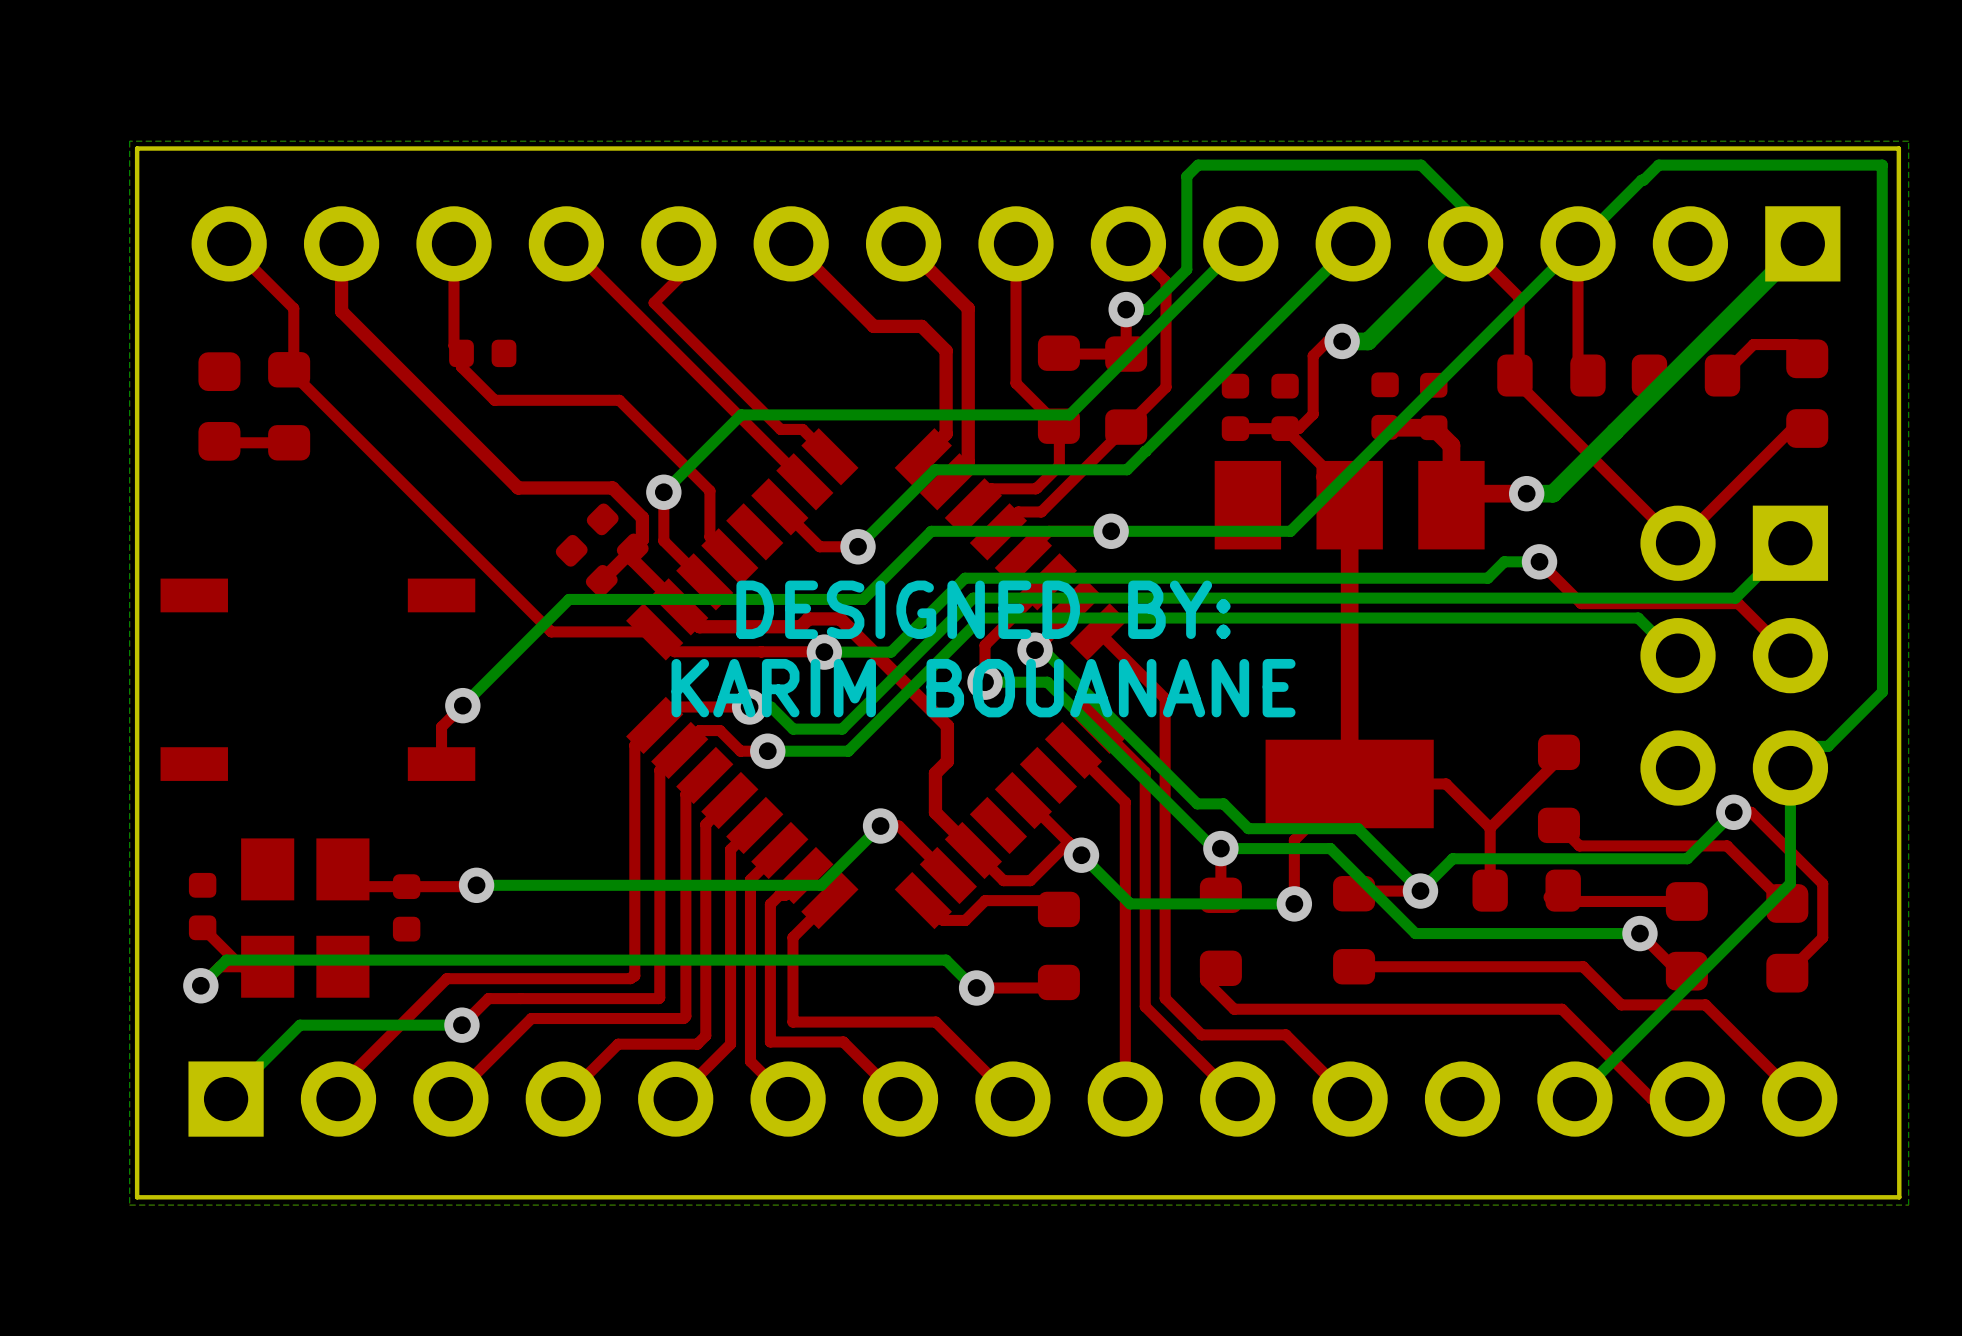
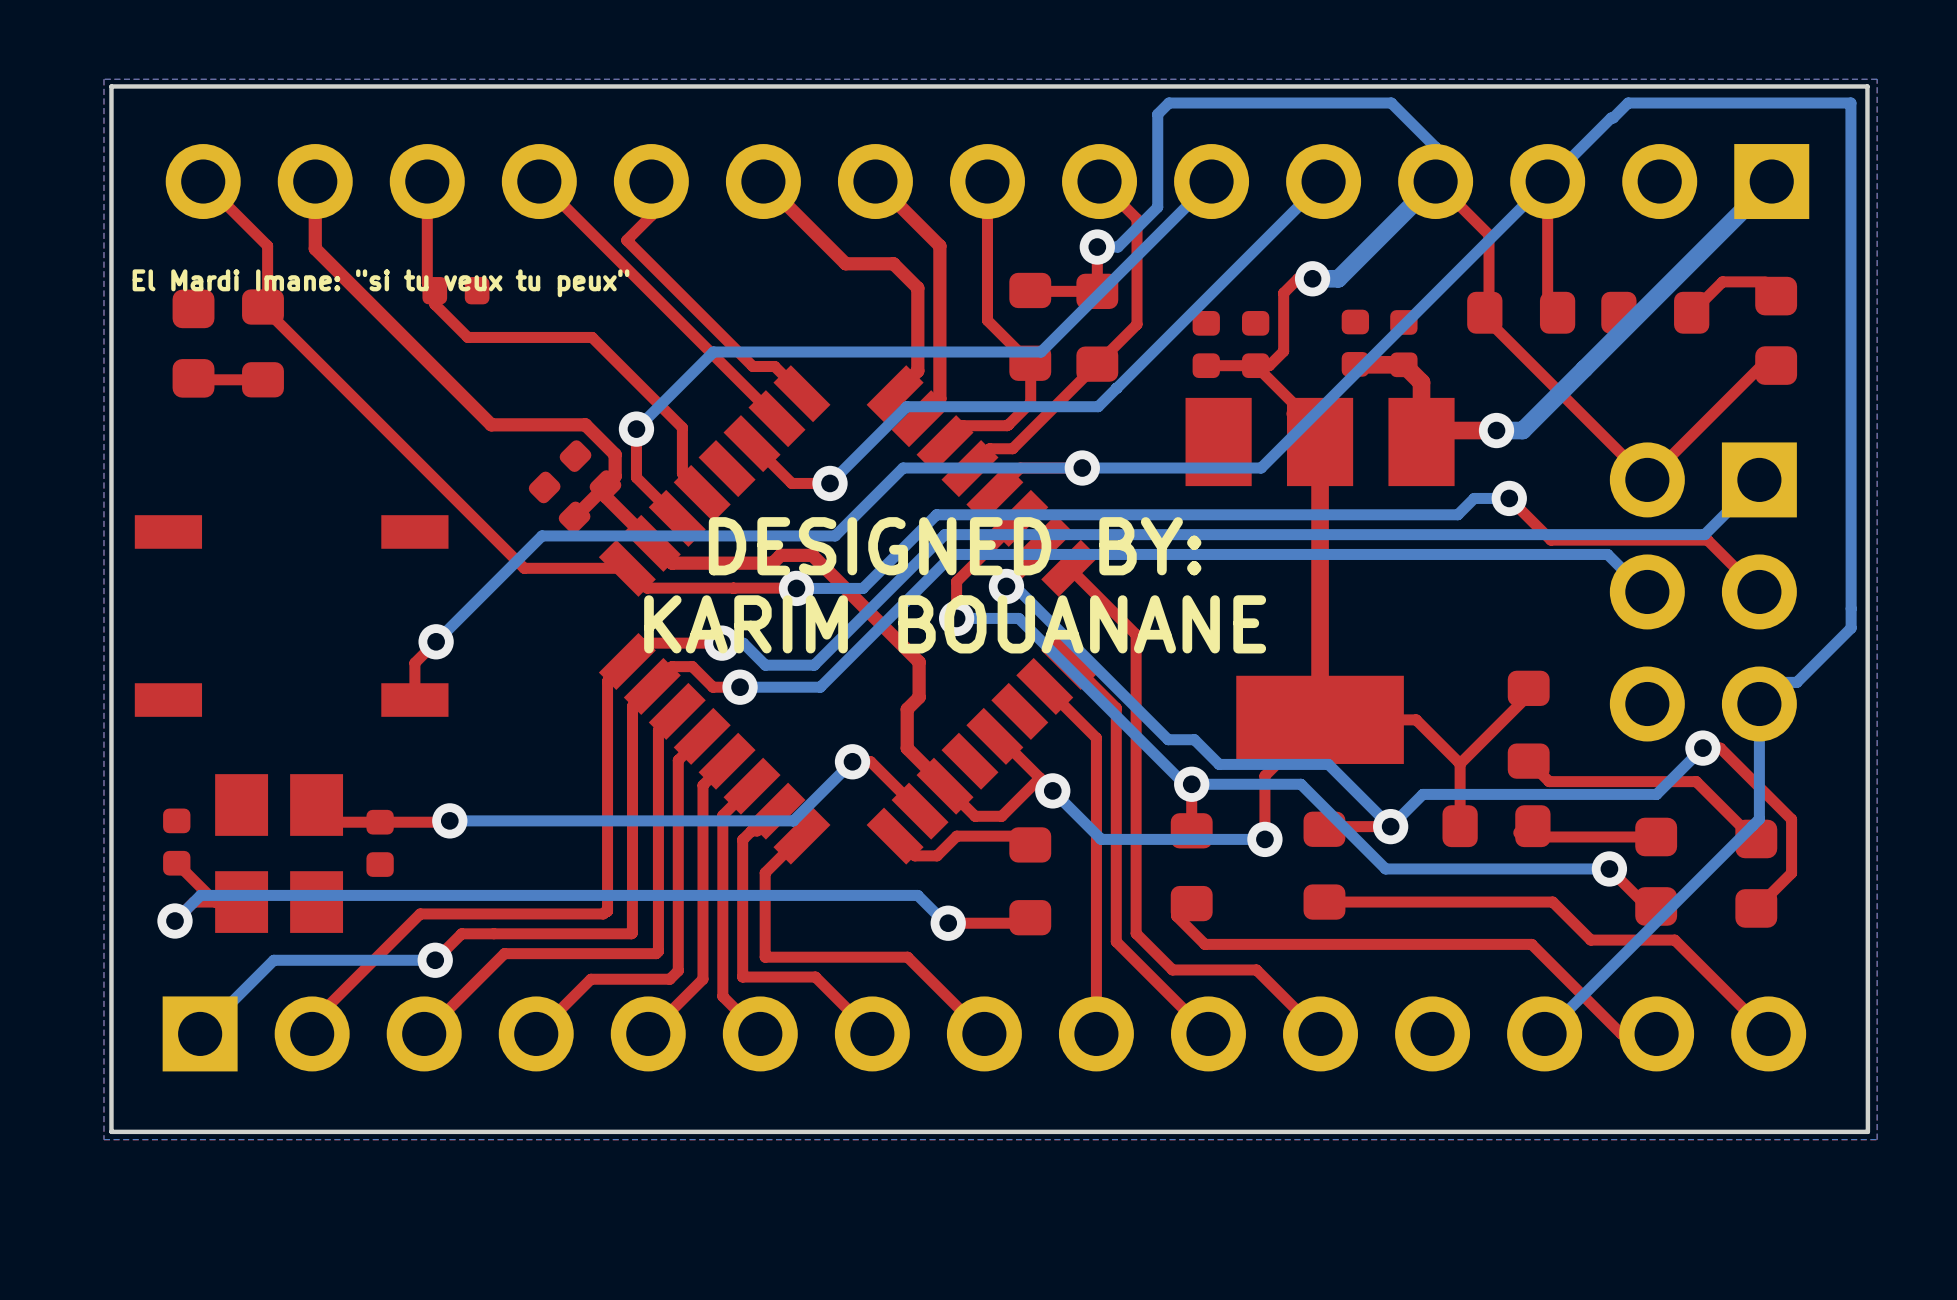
text: none -> El Mardi Imane: "si tu veux tu peux" (380, 283)

